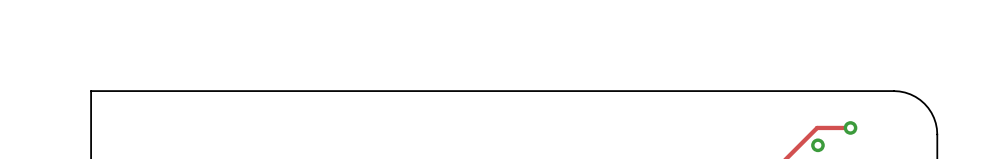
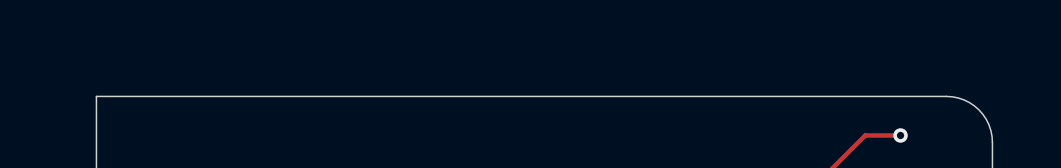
via: (817, 145) -> none

